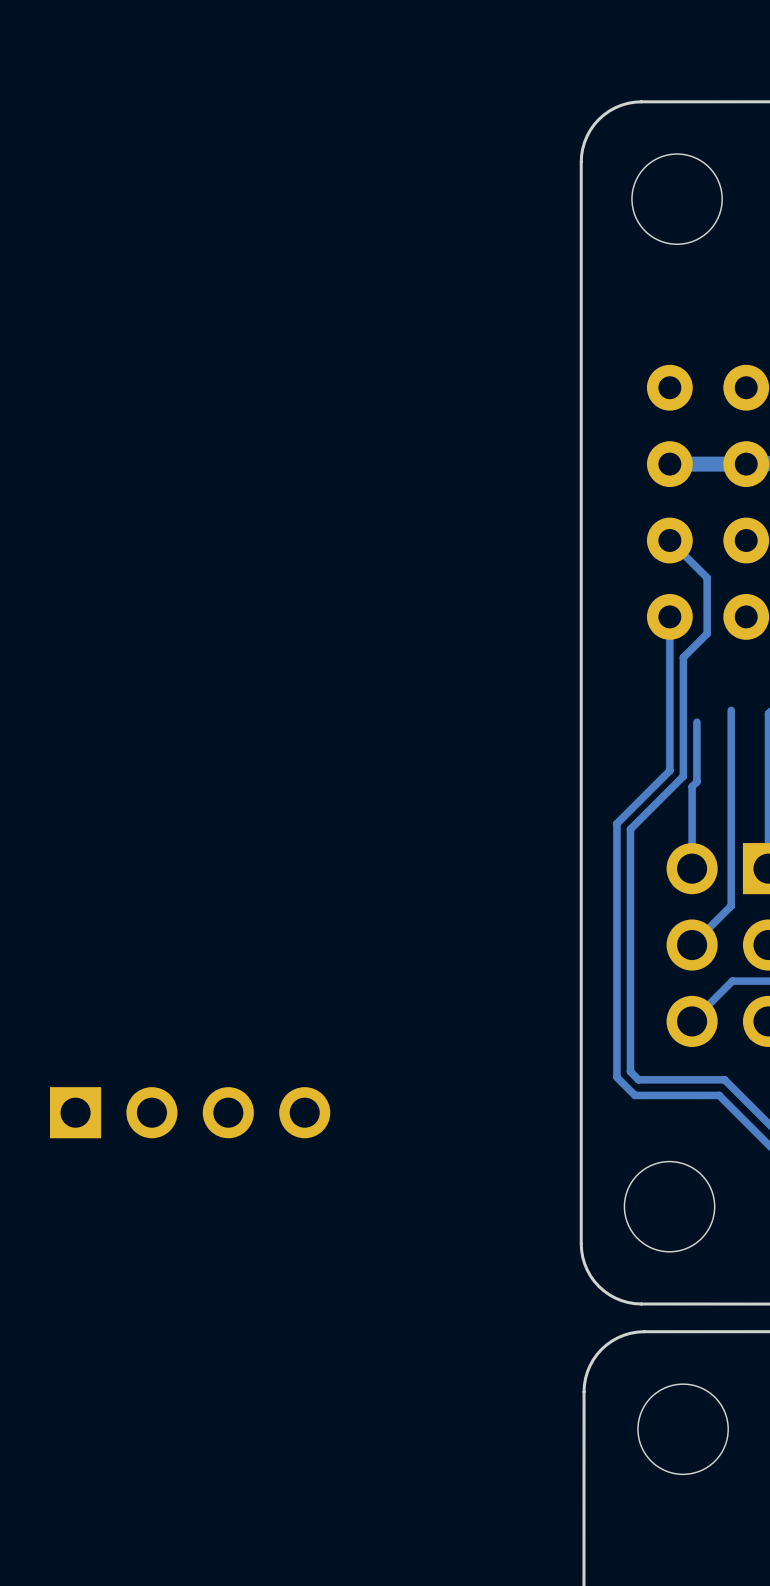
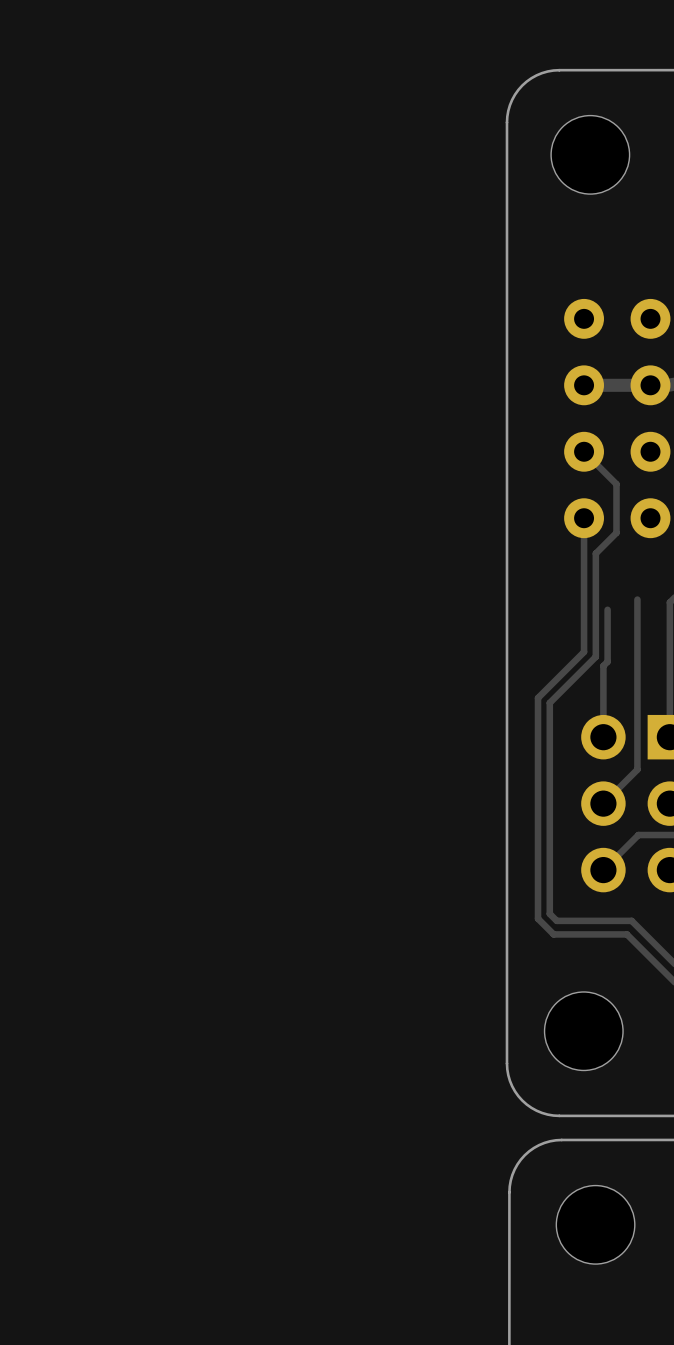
part: (190, 1112) -> none

